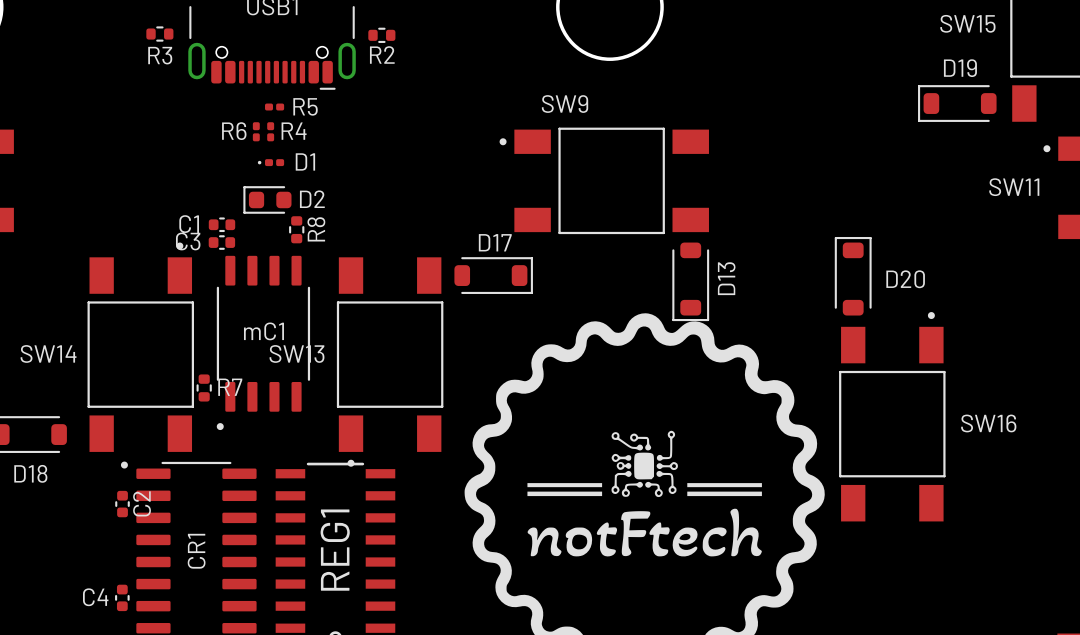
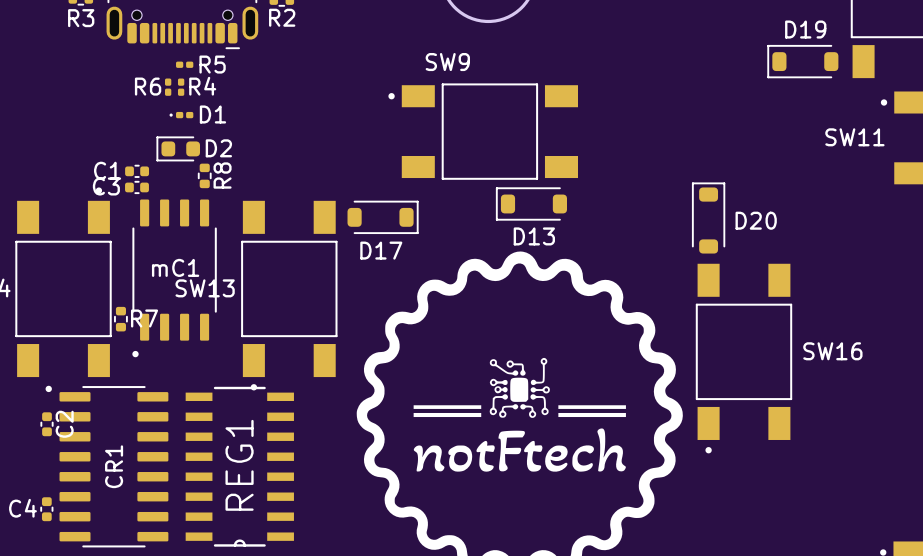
D17 name position: D17 (495, 242) -> D17 (381, 250)
D13 rotation: 0° (690, 281) -> 90° clockwise (531, 203)
SW16 rotation: 0° (892, 416) -> 180° (743, 358)

